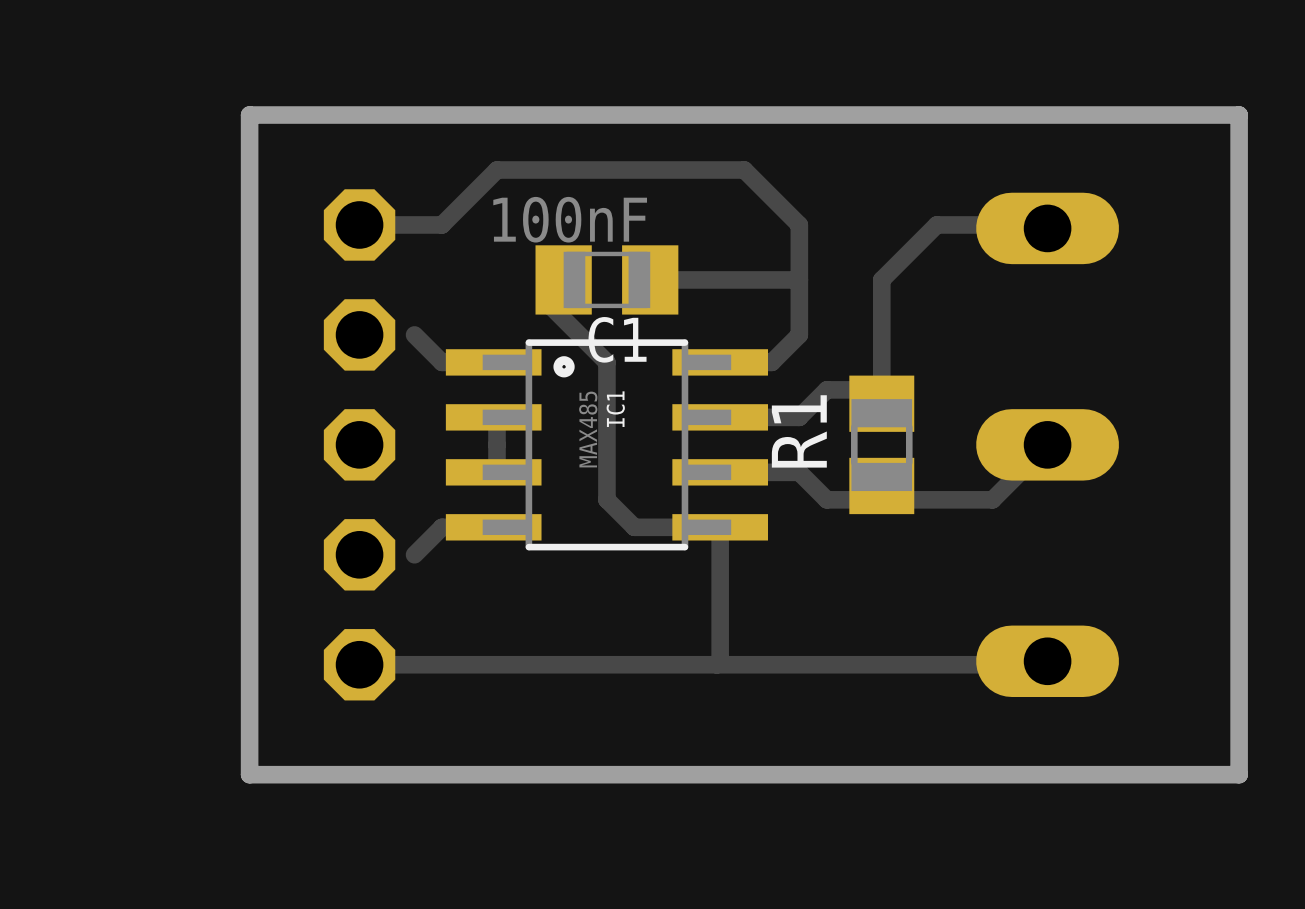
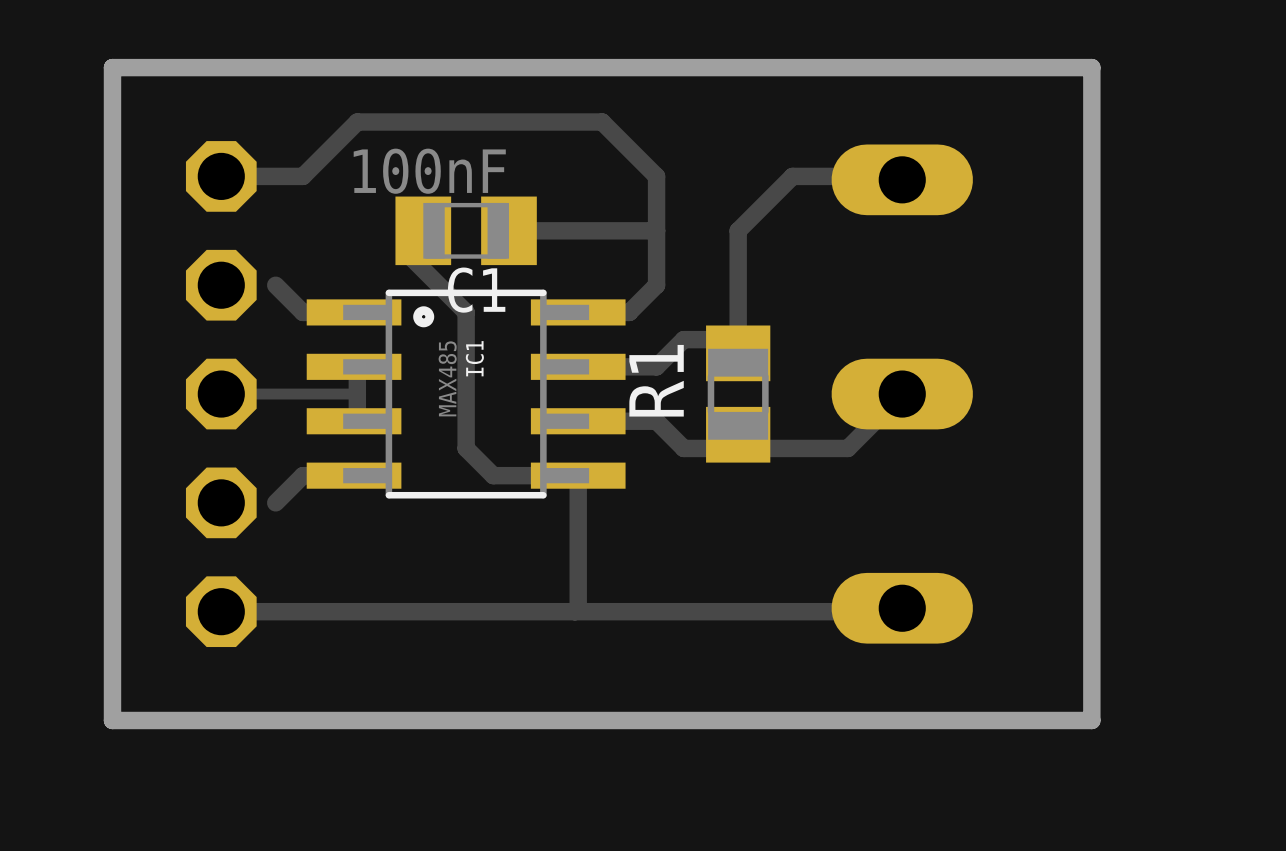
track: none -> (357, 394) (221, 394)

